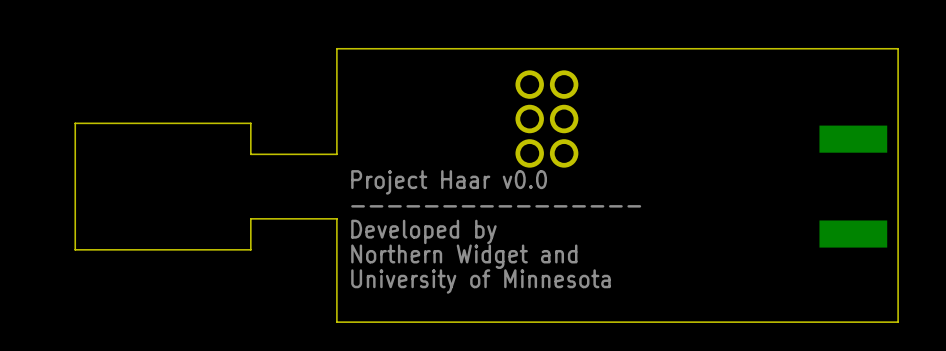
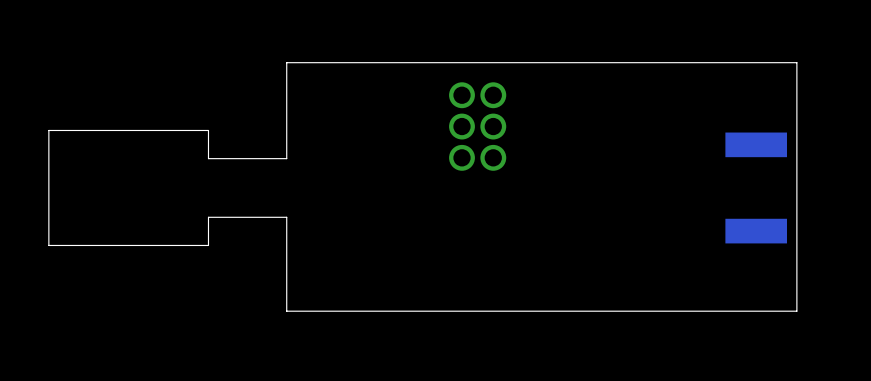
text: Project Haar v0.0 (449, 182) -> none
text: ---------------- (496, 206) -> none
text: Developed by (423, 231) -> none
text: Northern Widget and (464, 256) -> none
text: University of Minnesota (480, 281) -> none

